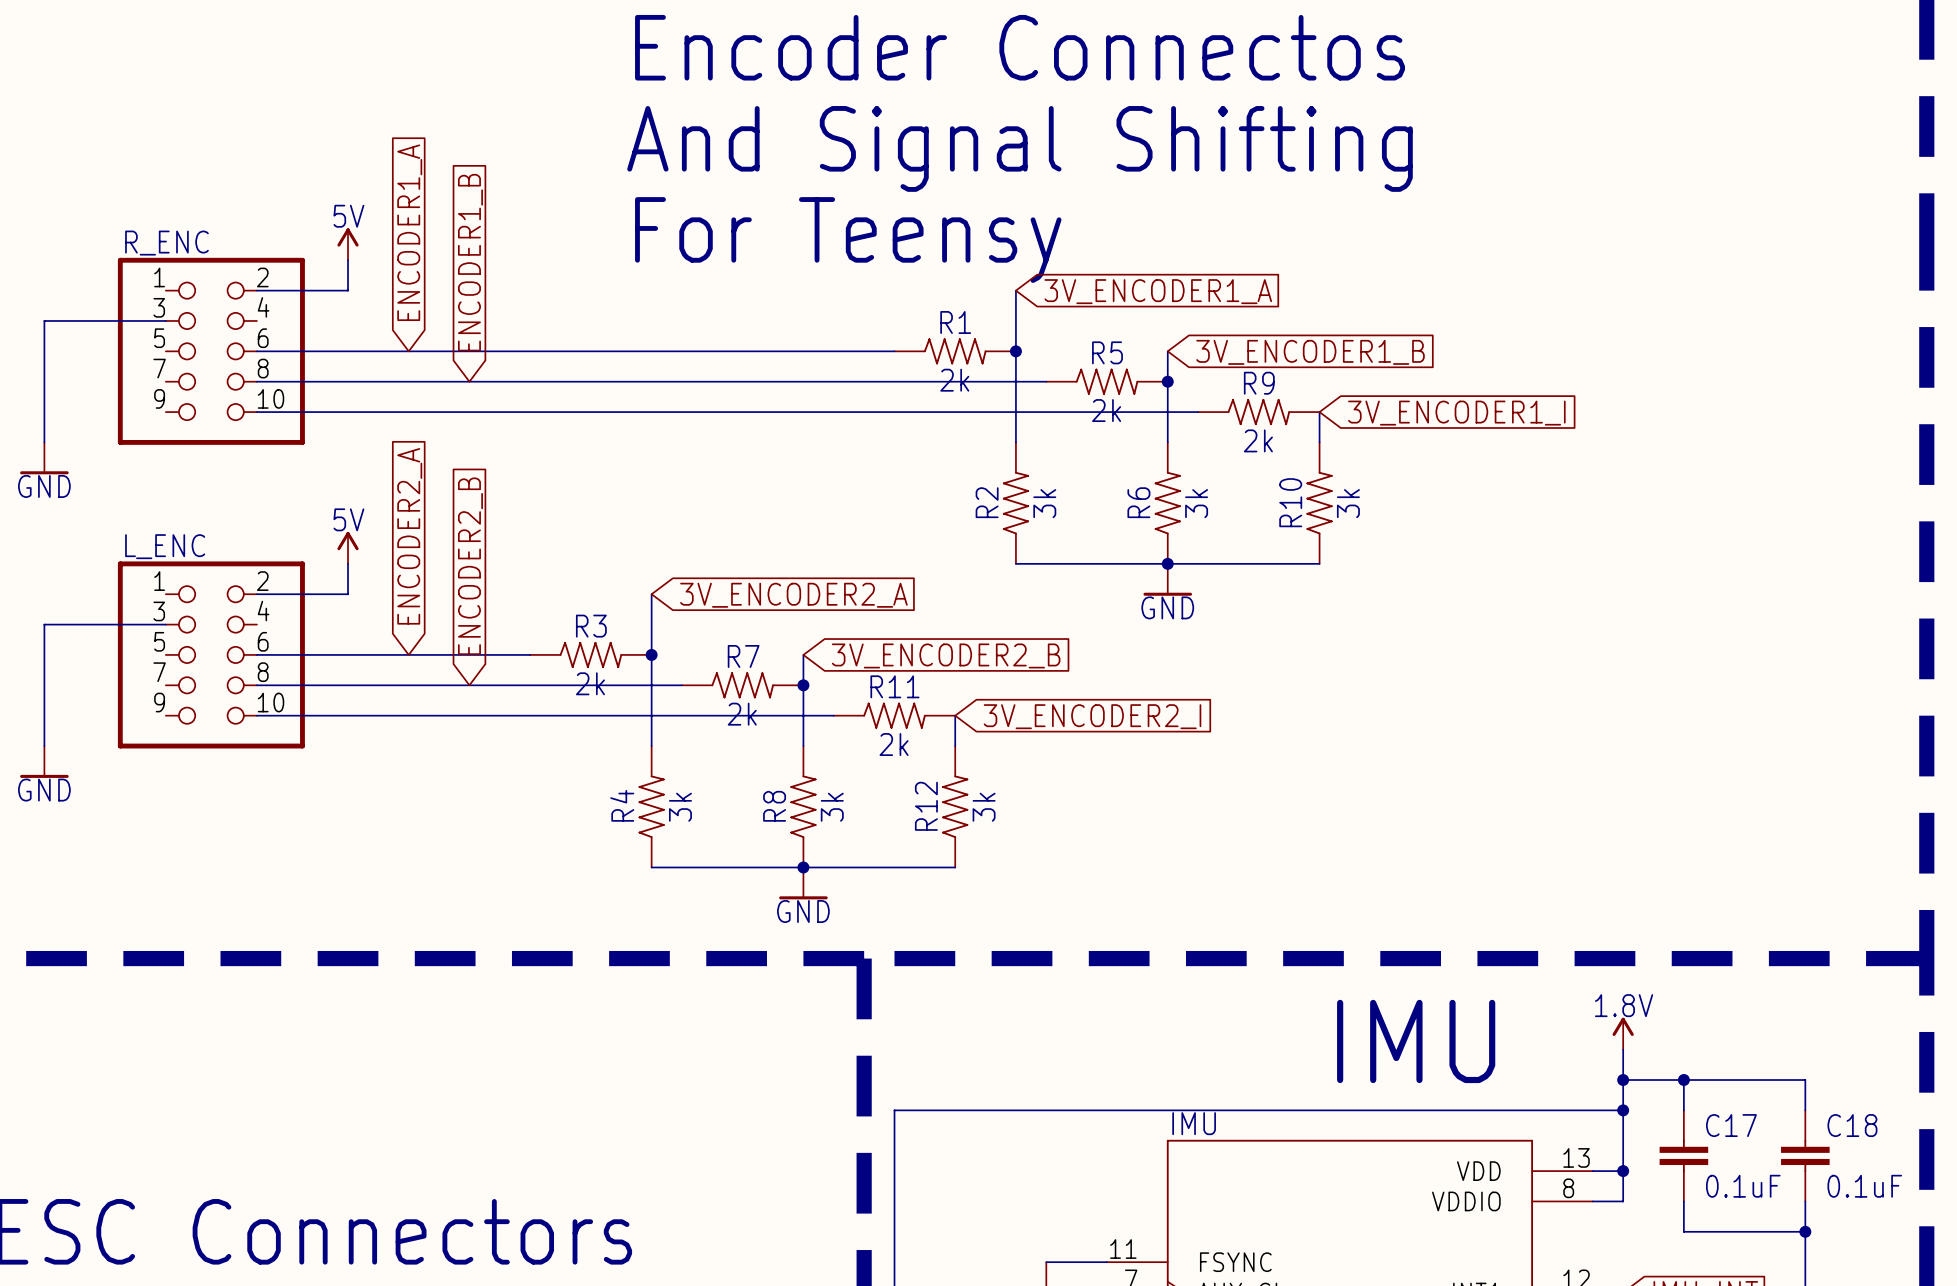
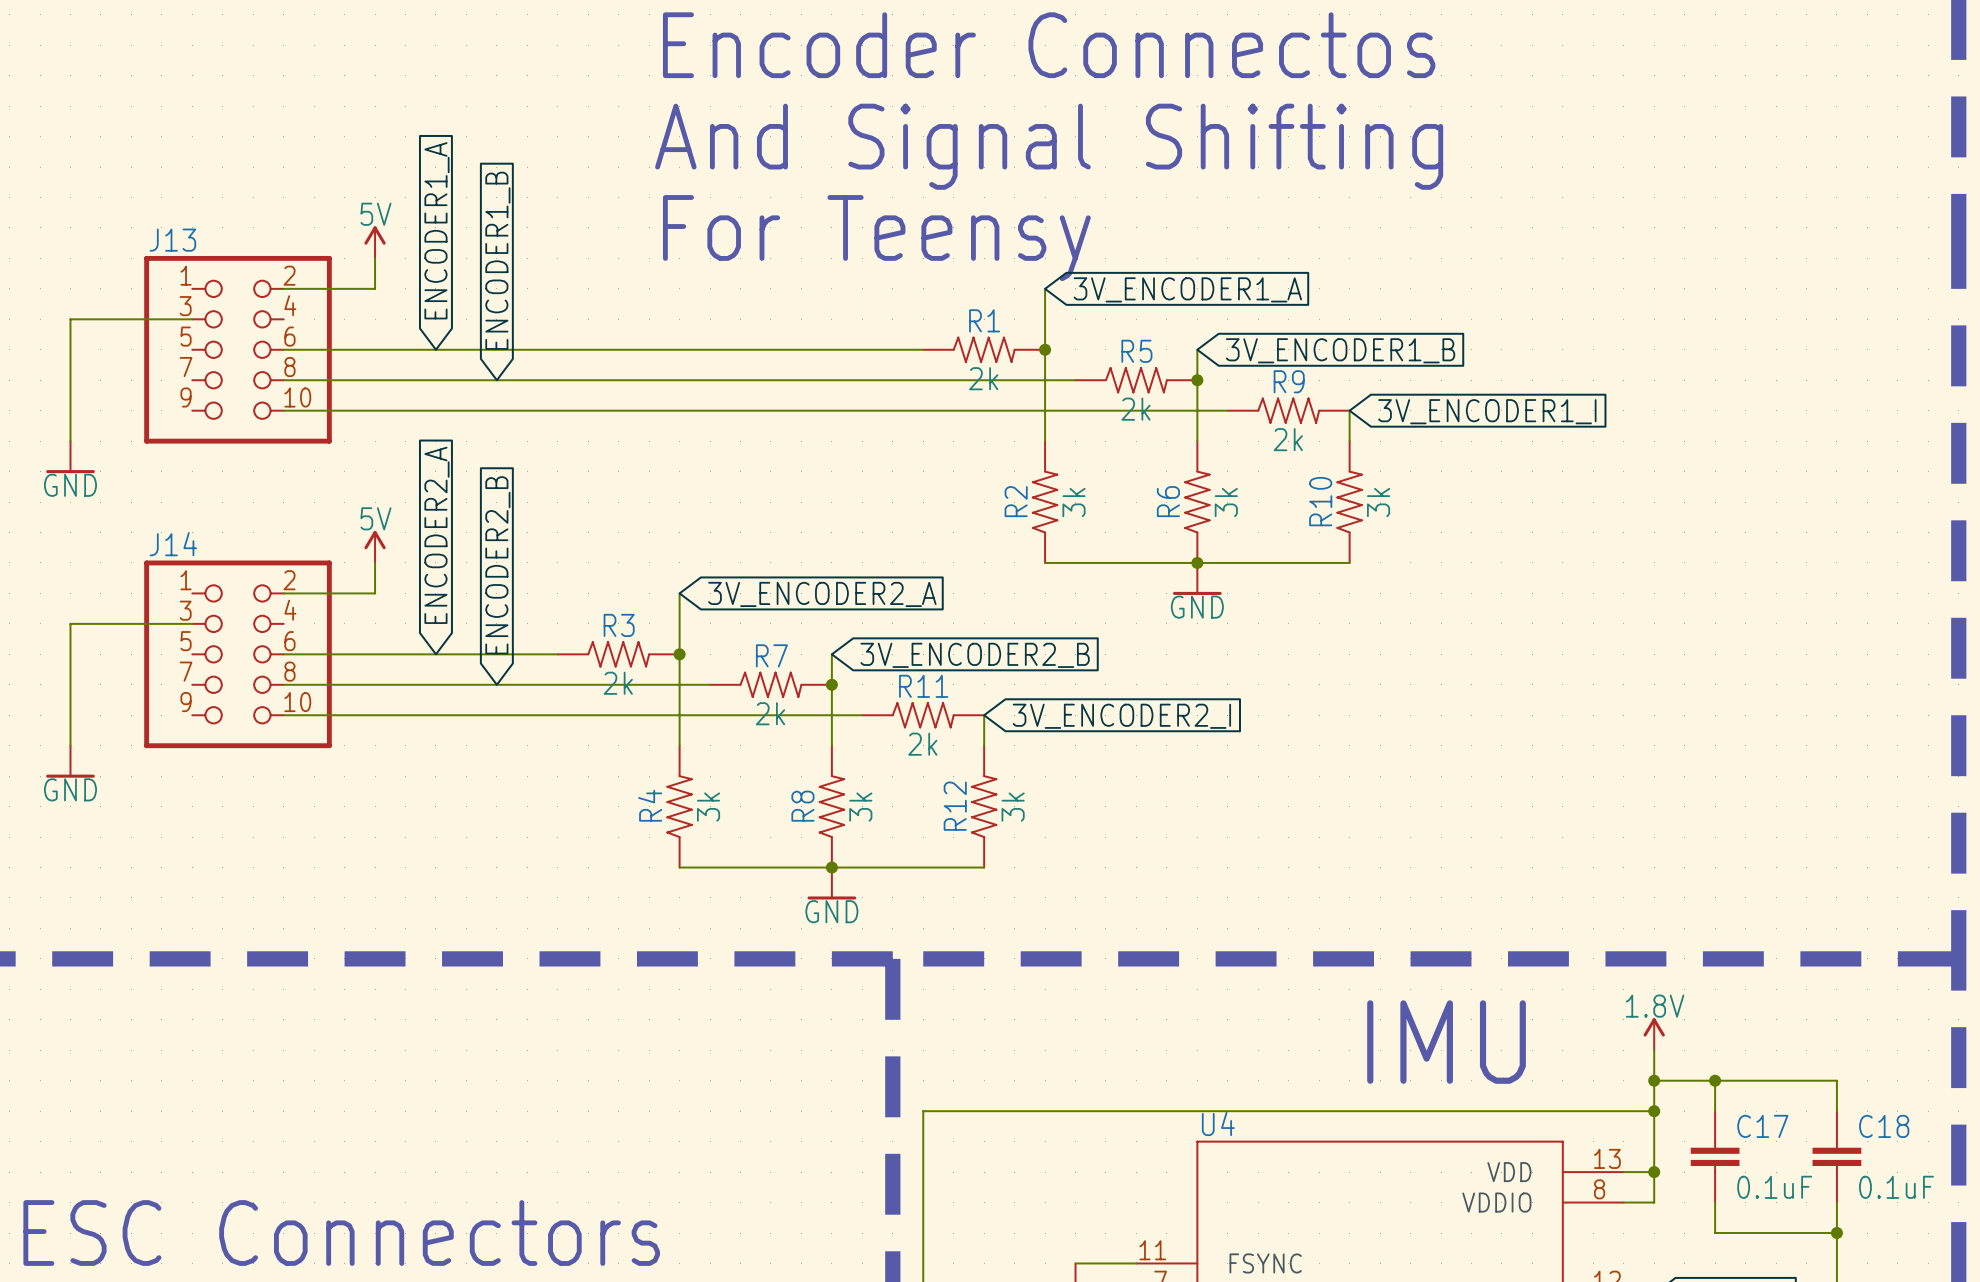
R_ENC name: R_ENC (166, 243) -> J13 (172, 240)
L_ENC name: L_ENC (165, 546) -> J14 (173, 544)
IMU name: IMU (1194, 1123) -> U4 (1218, 1123)

